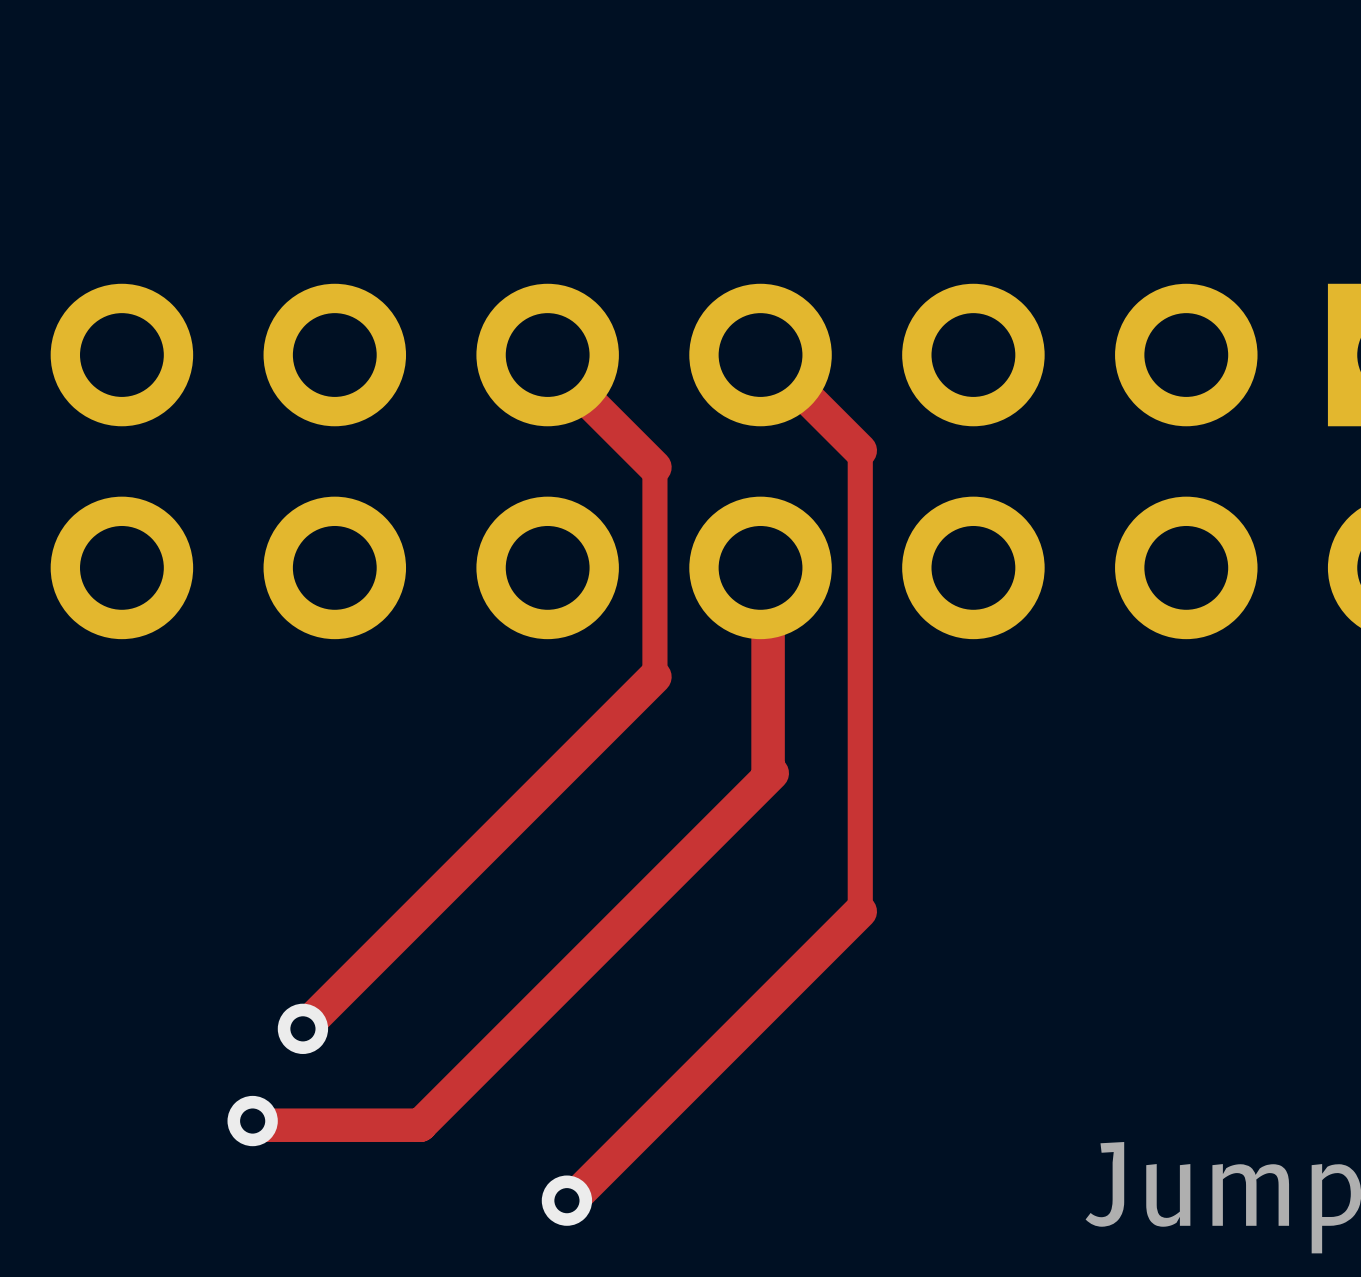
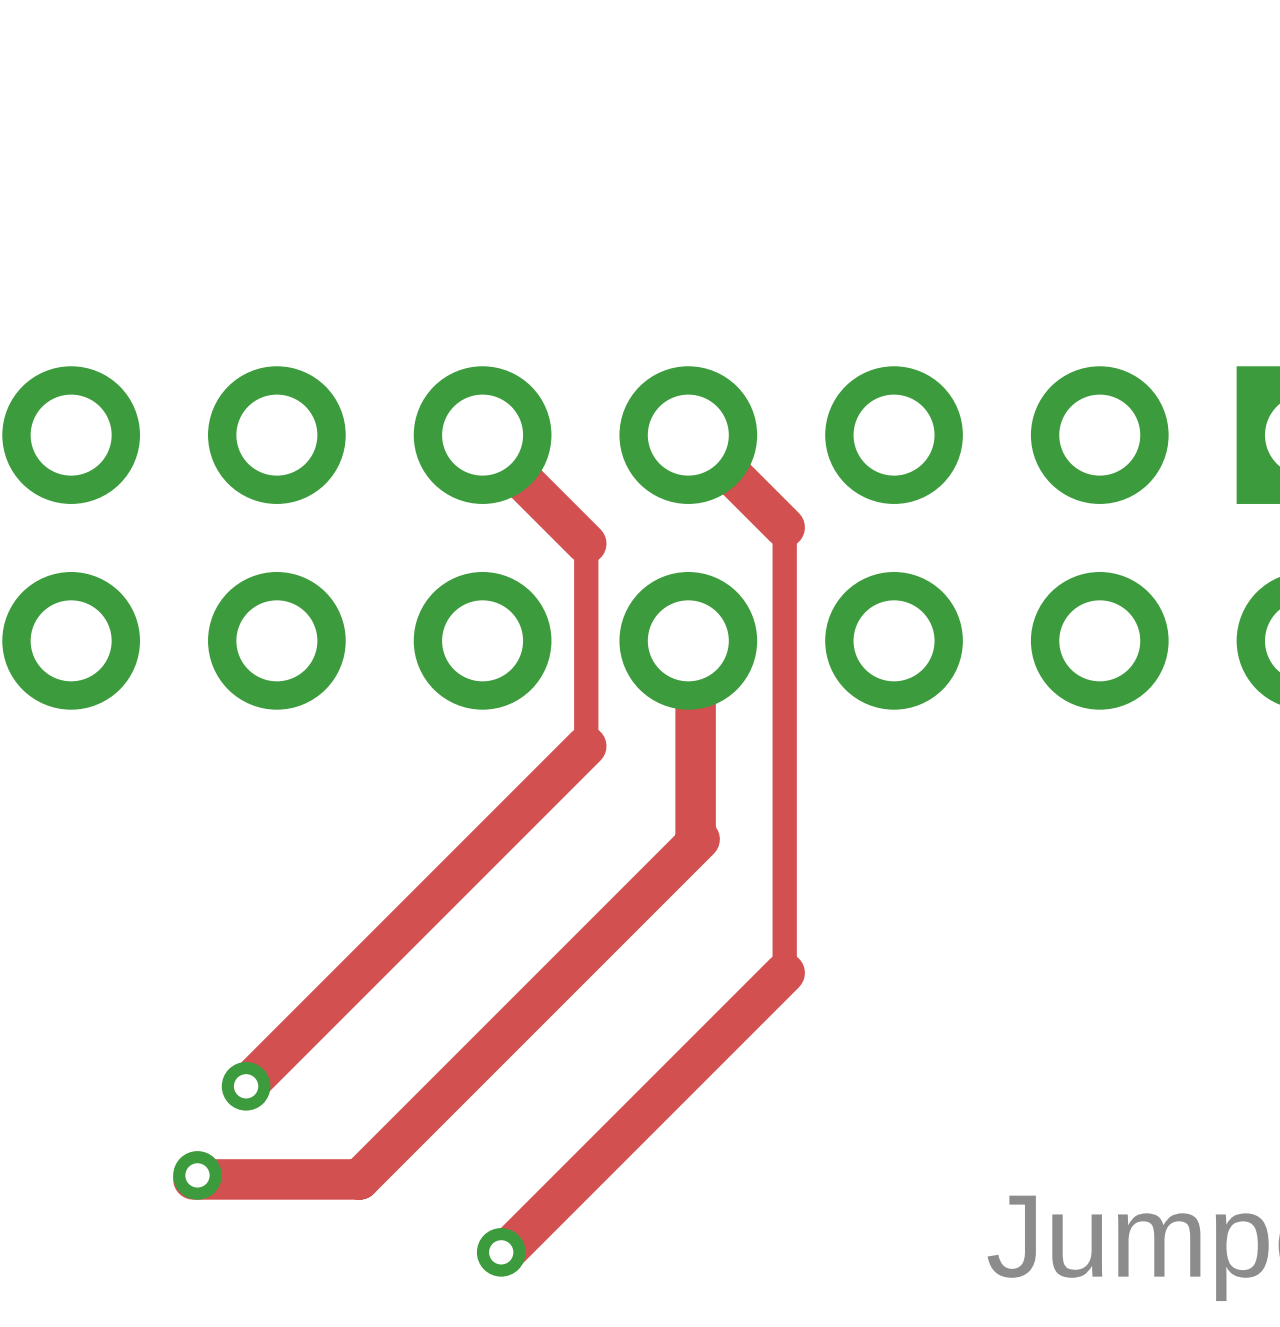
track width: thin (541, 354) (654, 467) -> thick (476, 434) (586, 543)
track width: thin (768, 358) (860, 450) -> thick (695, 438) (784, 527)
track width: thin (768, 572) (768, 773) -> thick (695, 644) (695, 839)
track width: thin (654, 676) (300, 1030) -> thick (586, 746) (244, 1088)
track width: thin (772, 773) (420, 1125) (248, 1125) -> thick (699, 839) (359, 1179) (193, 1179)
track width: thin (860, 911) (571, 1200) -> thick (784, 972) (505, 1252)

